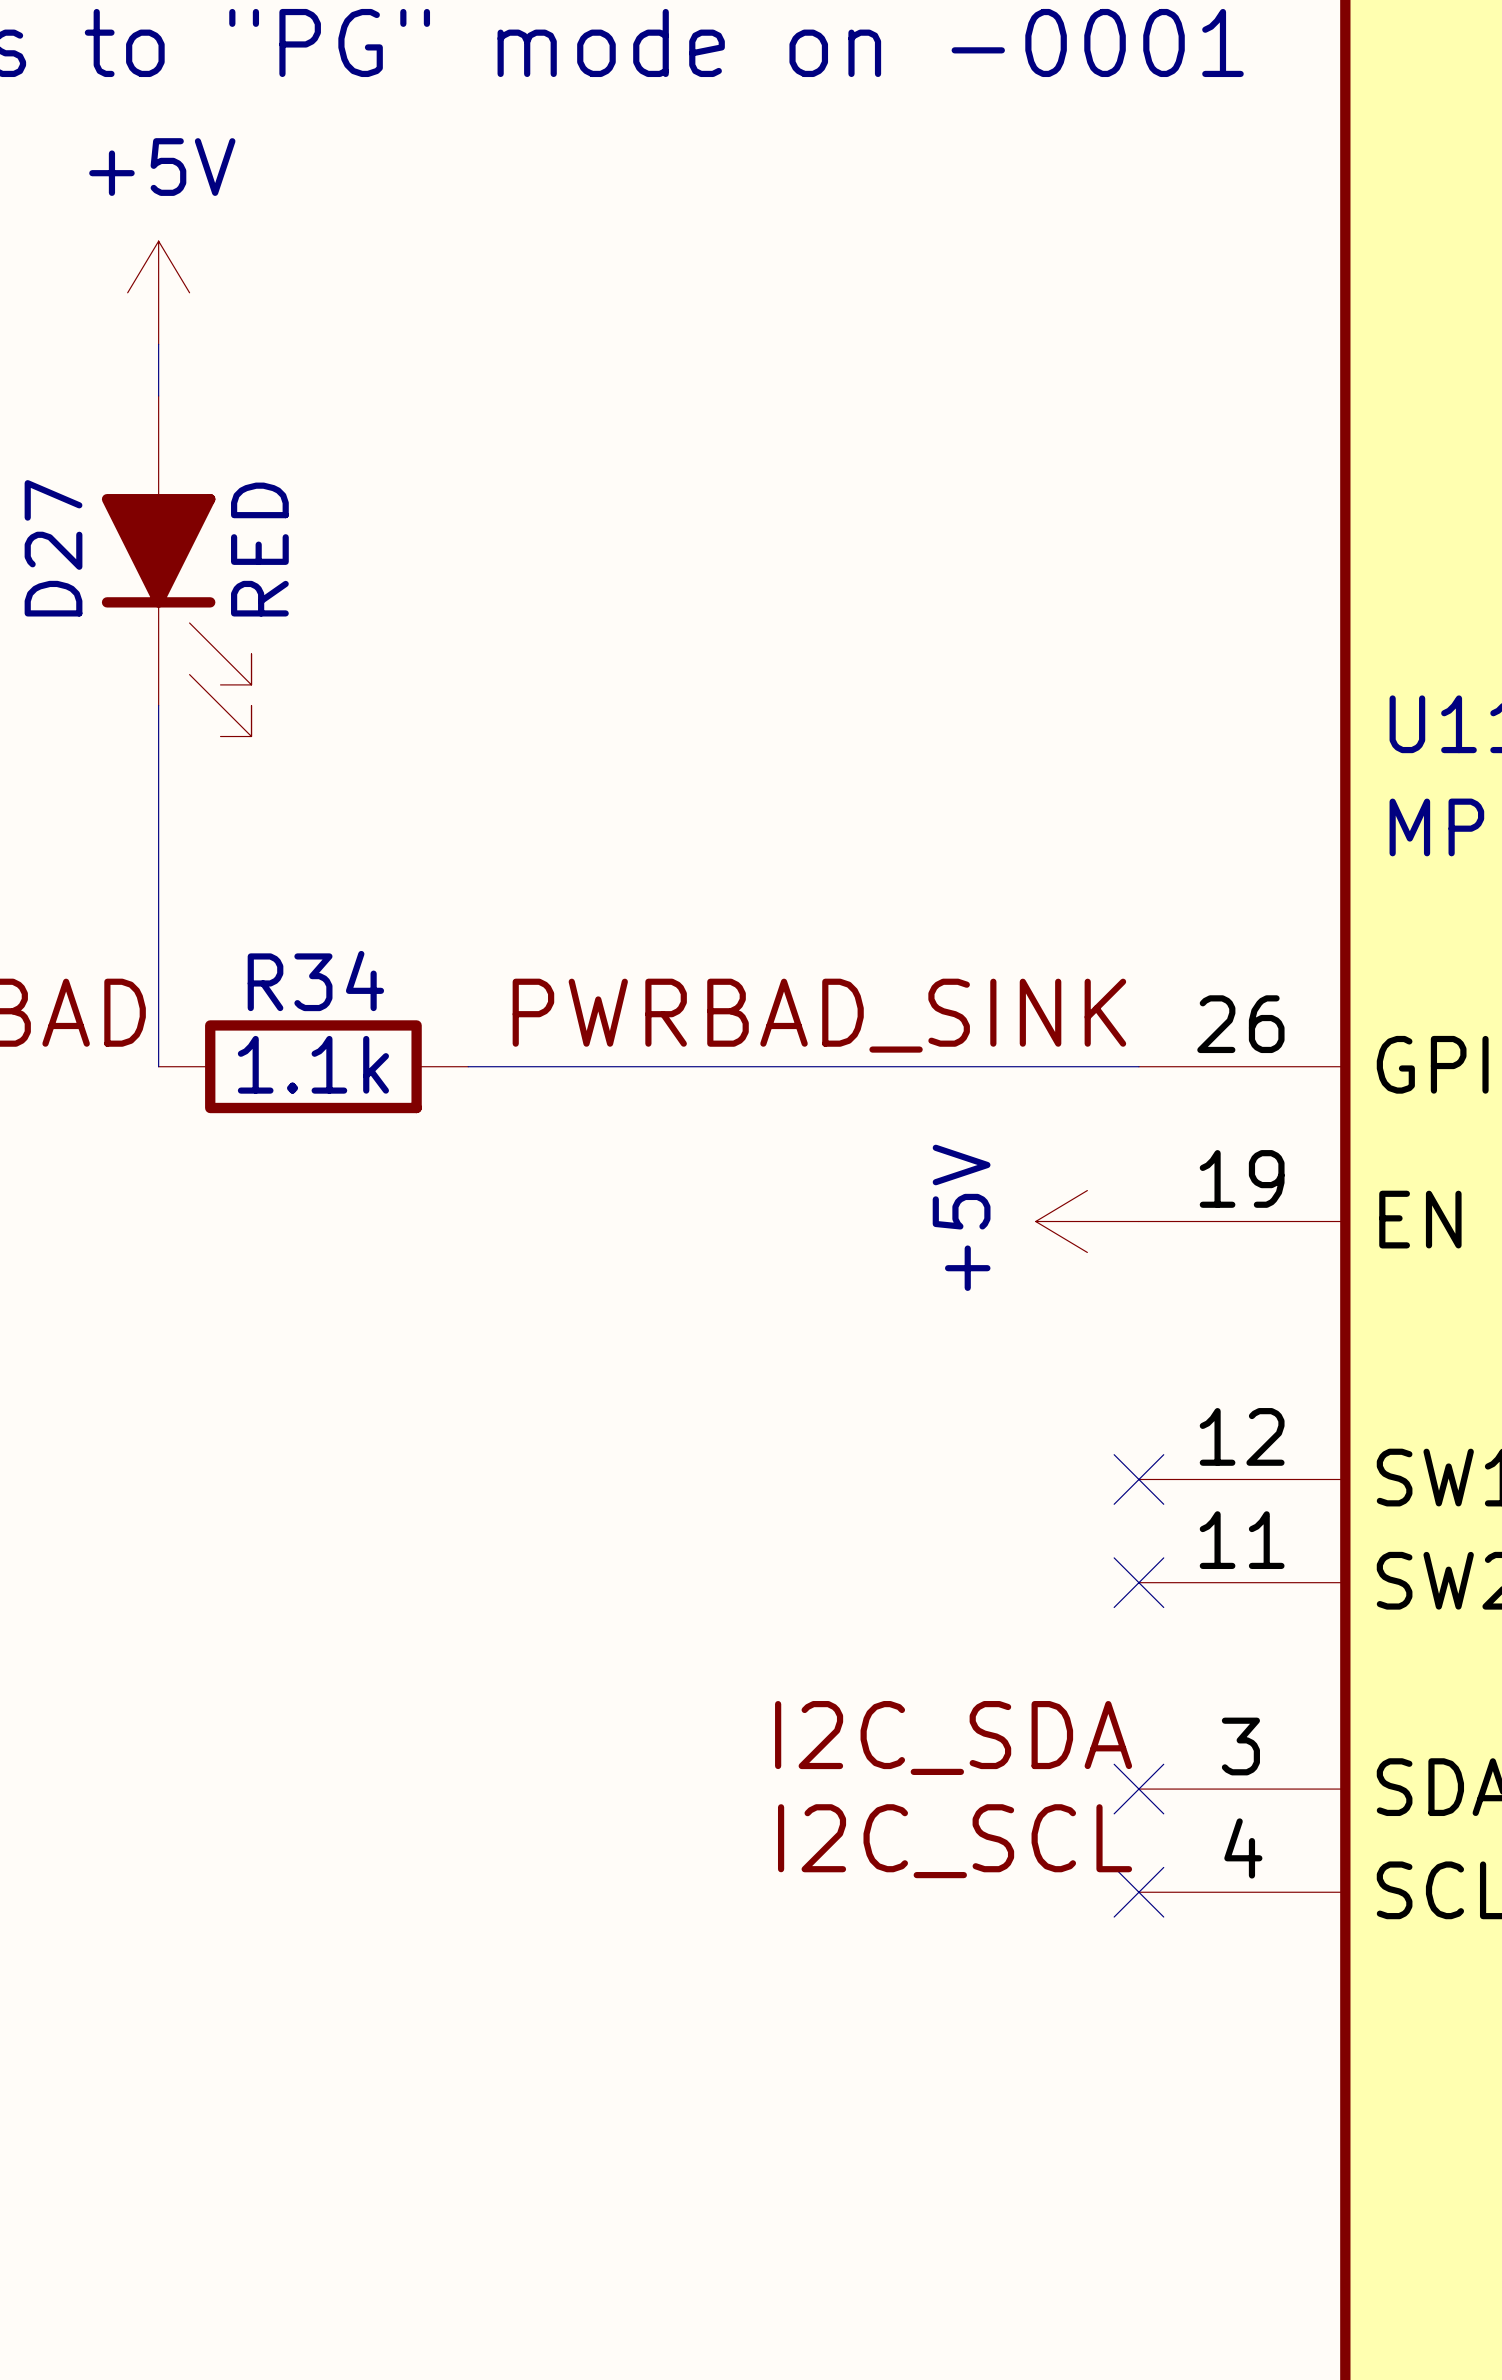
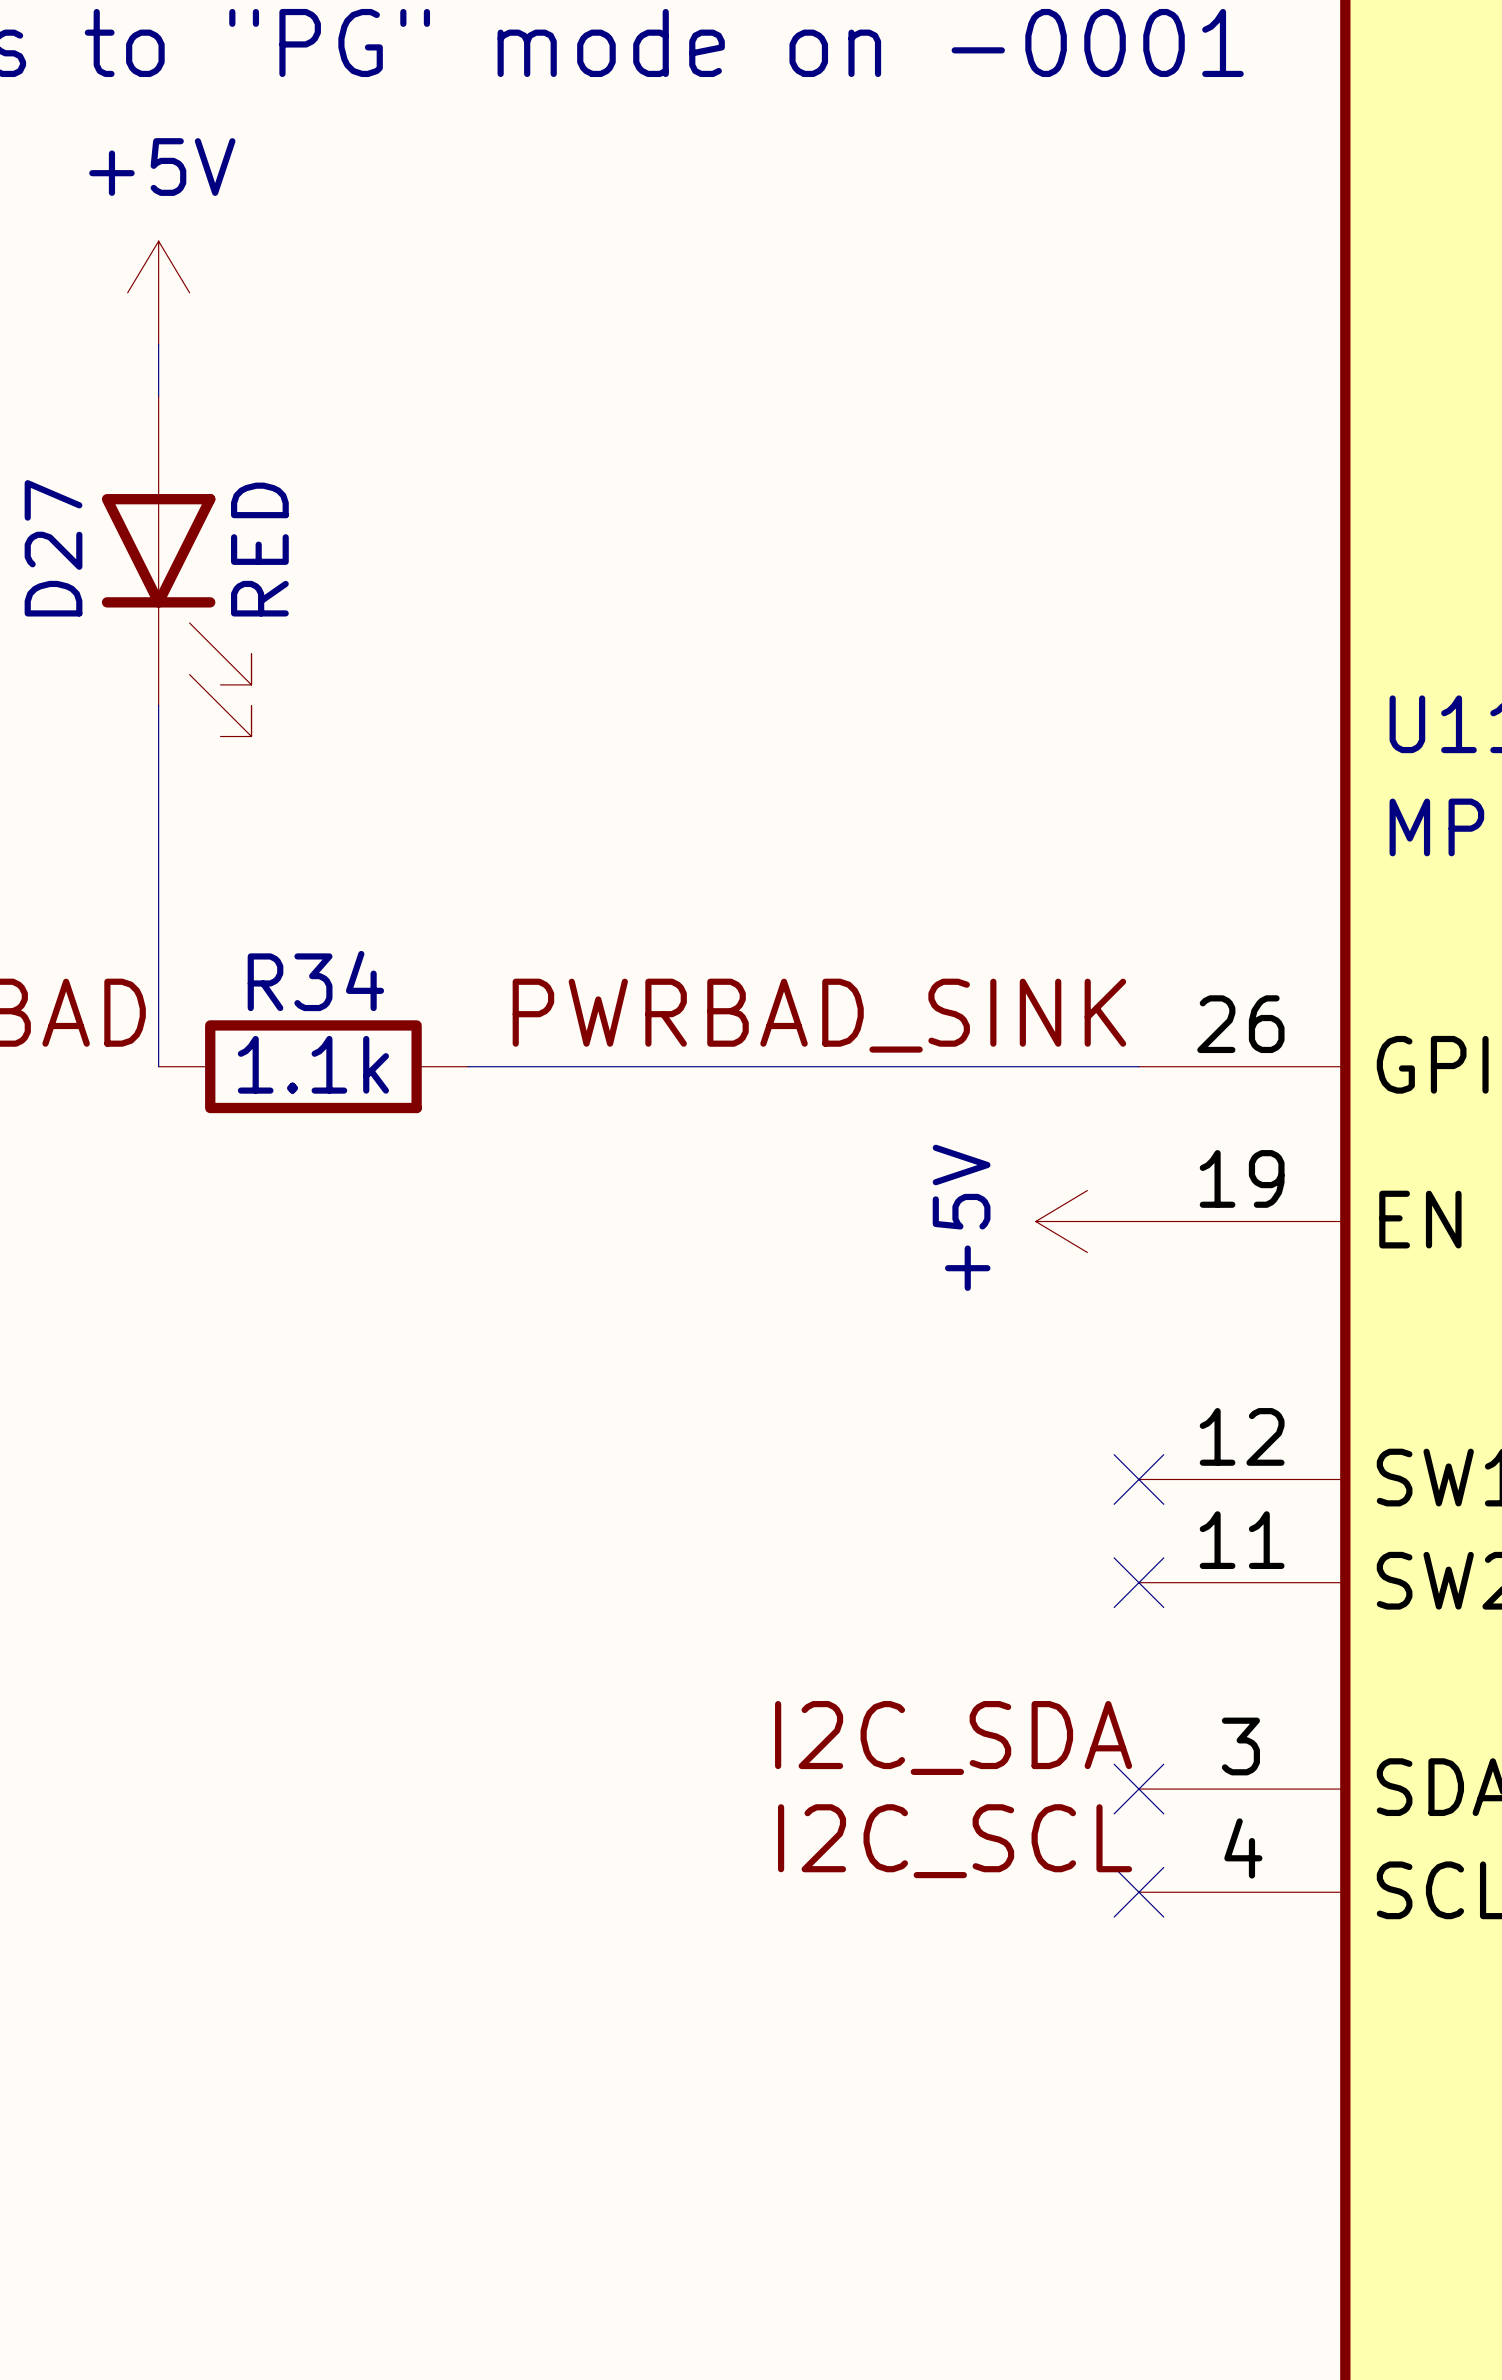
D27 symbol: [101, 395, 252, 737] -> [101, 395, 252, 737]

